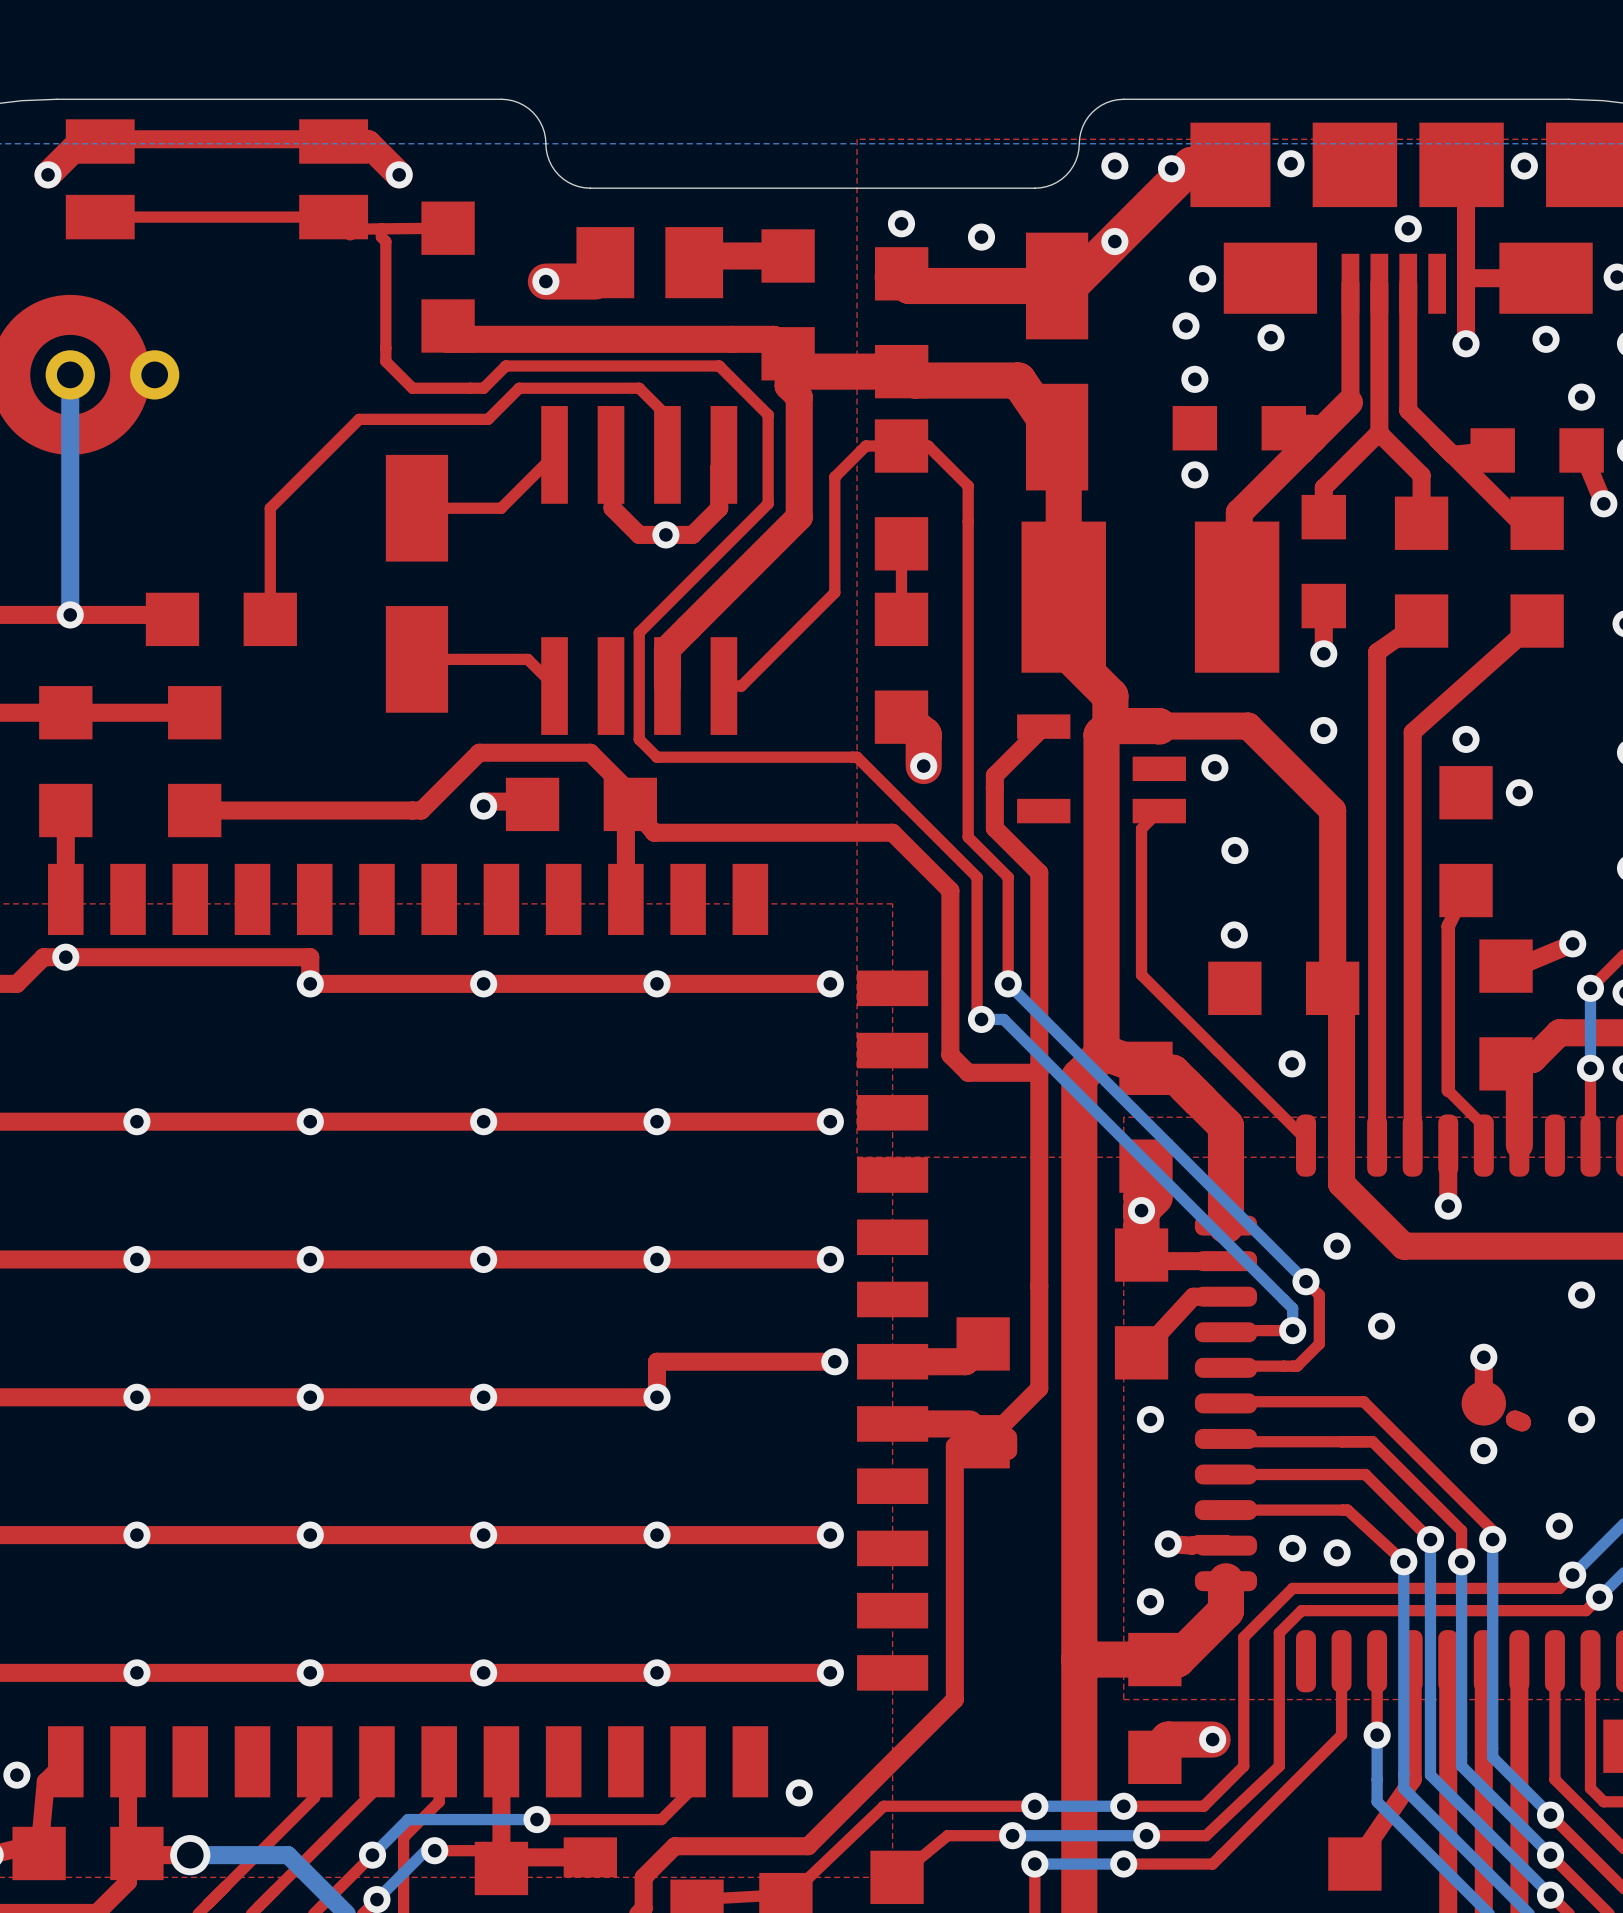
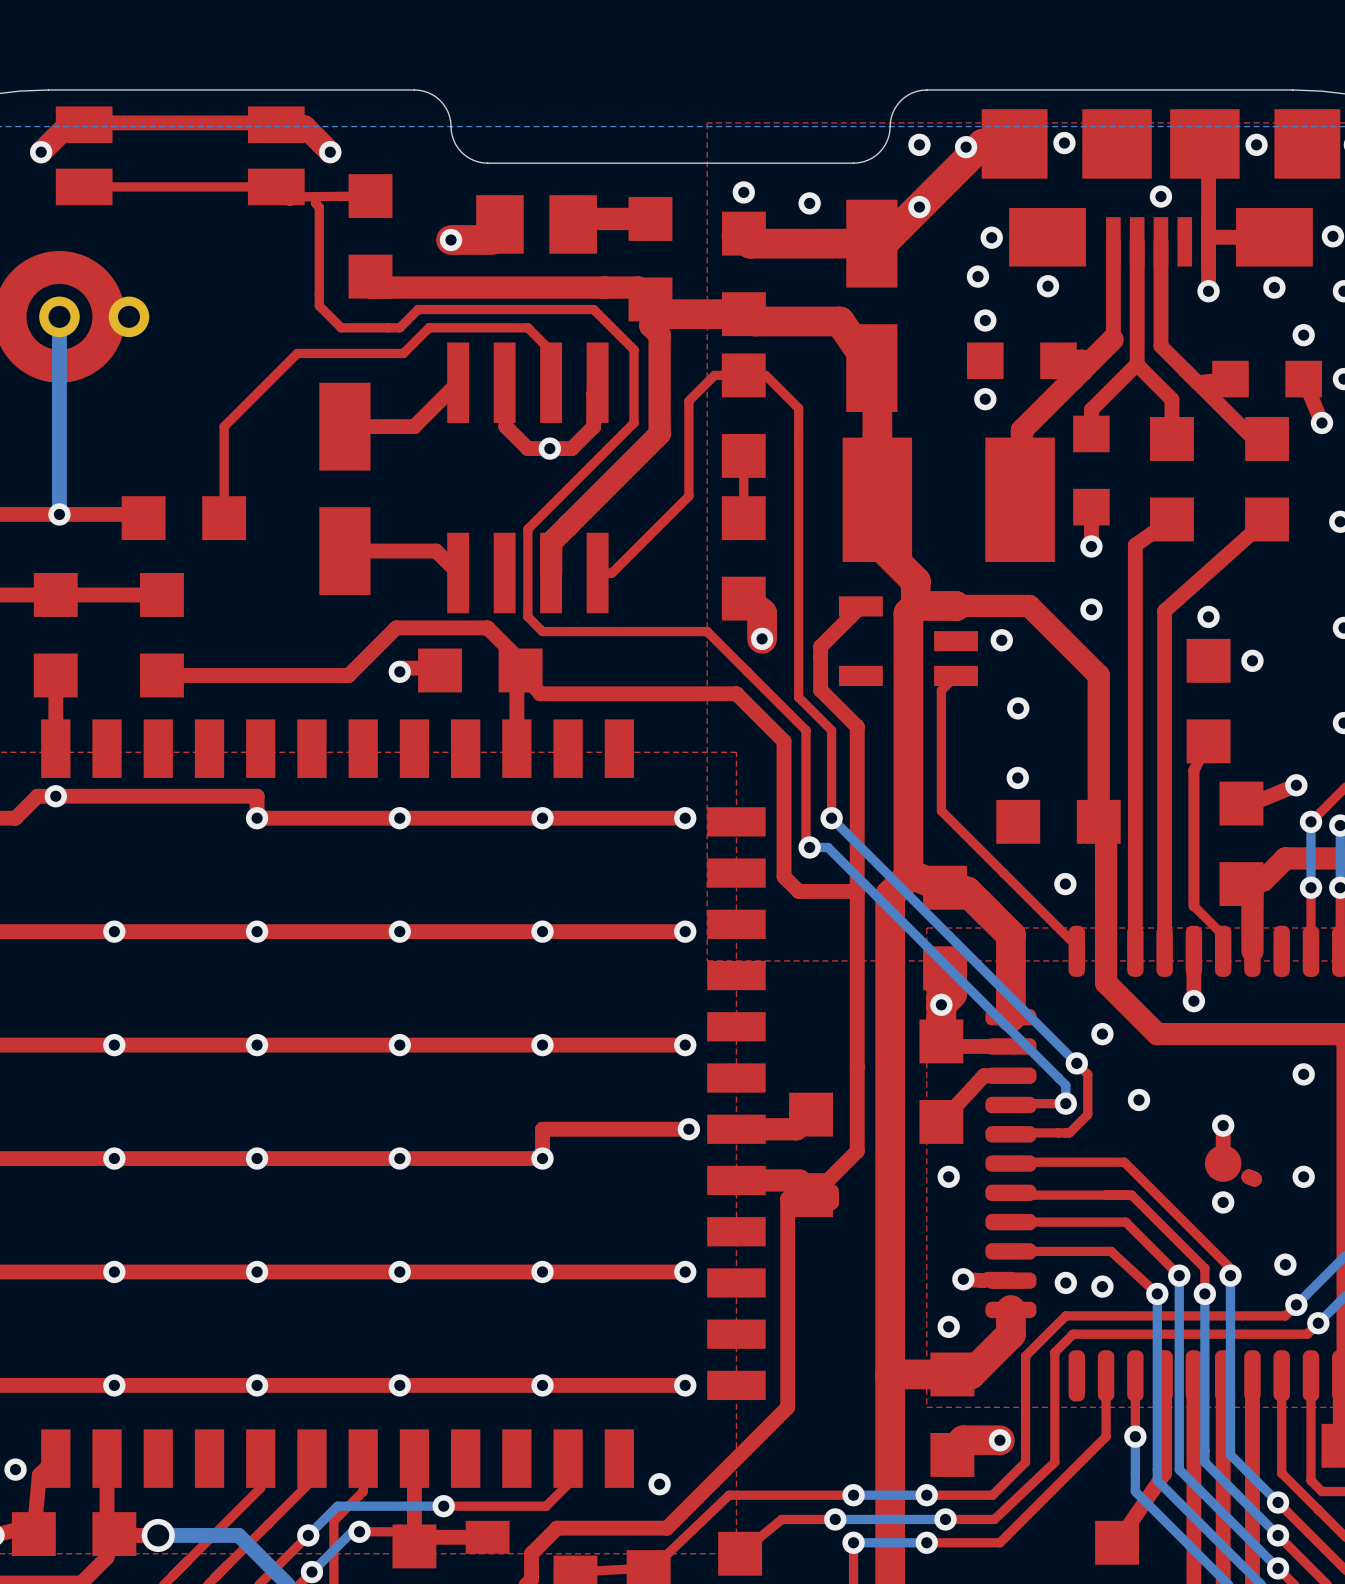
top track width: thin (554, 454) (501, 508) (416, 508) -> thick (458, 382) (414, 426) (344, 426)
top track width: thin (416, 659) (527, 659) (554, 686) -> thick (344, 551) (436, 551) (458, 573)

